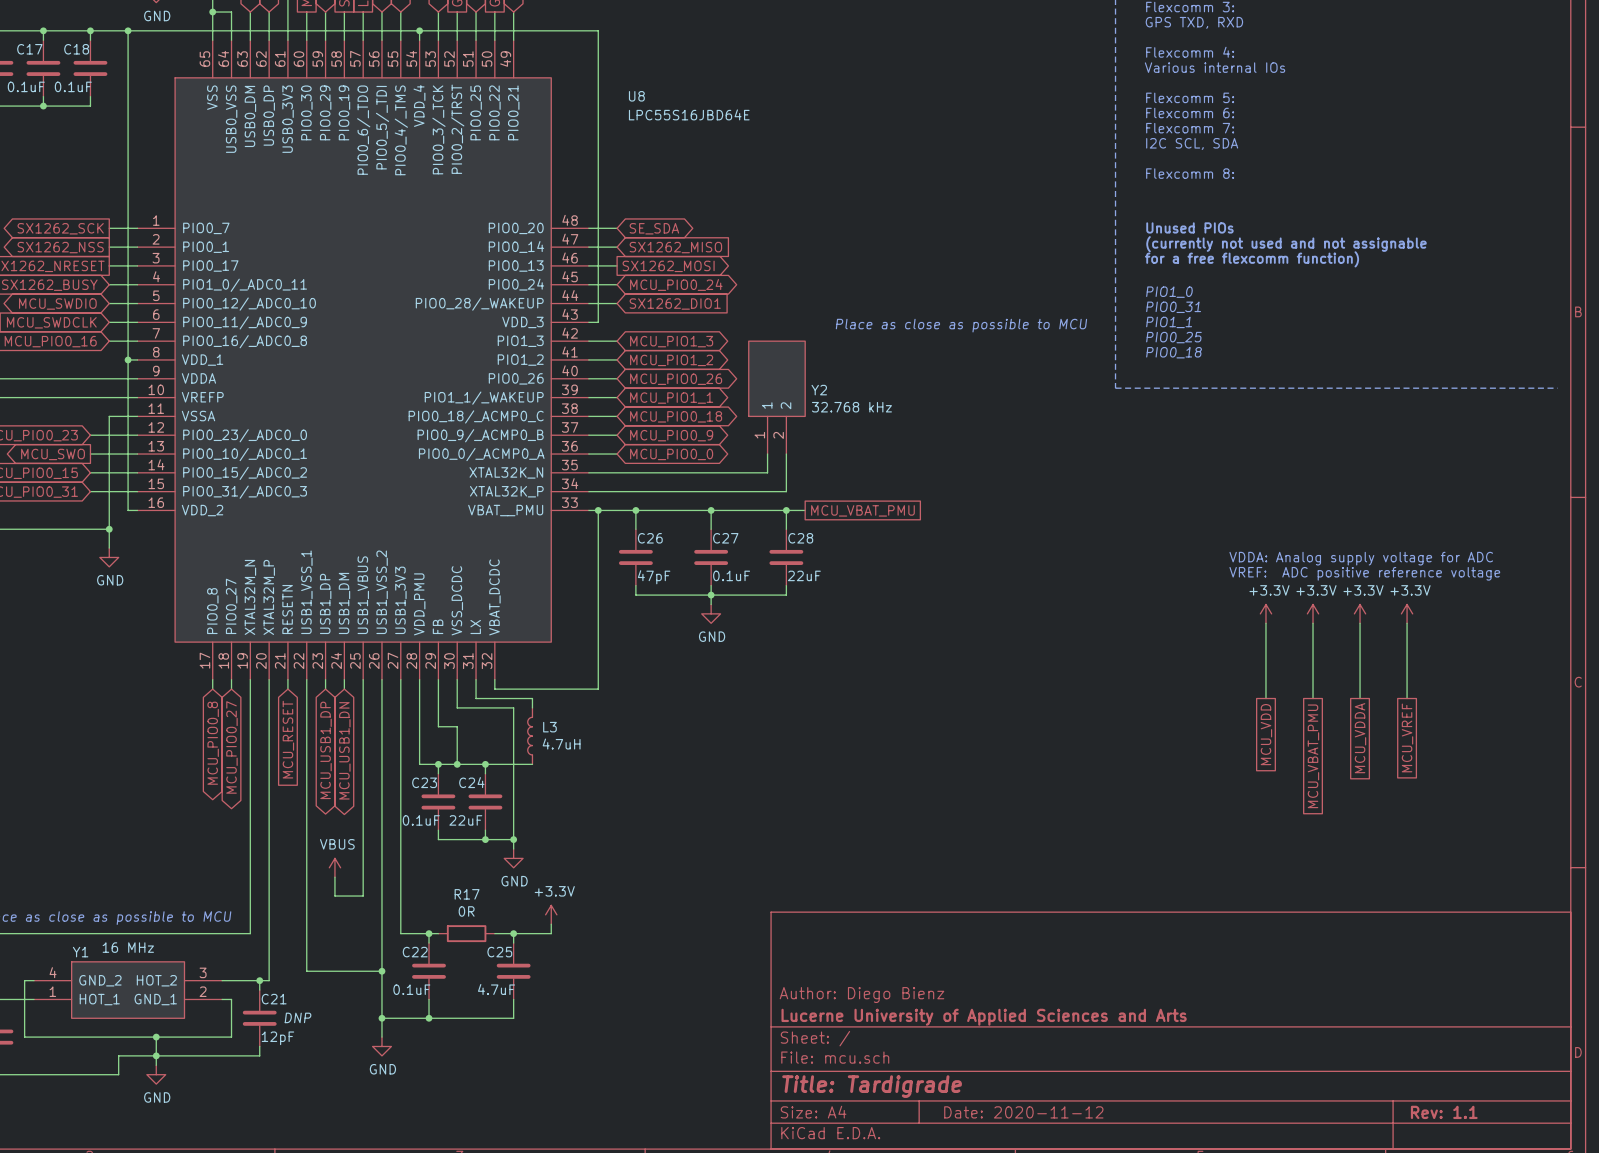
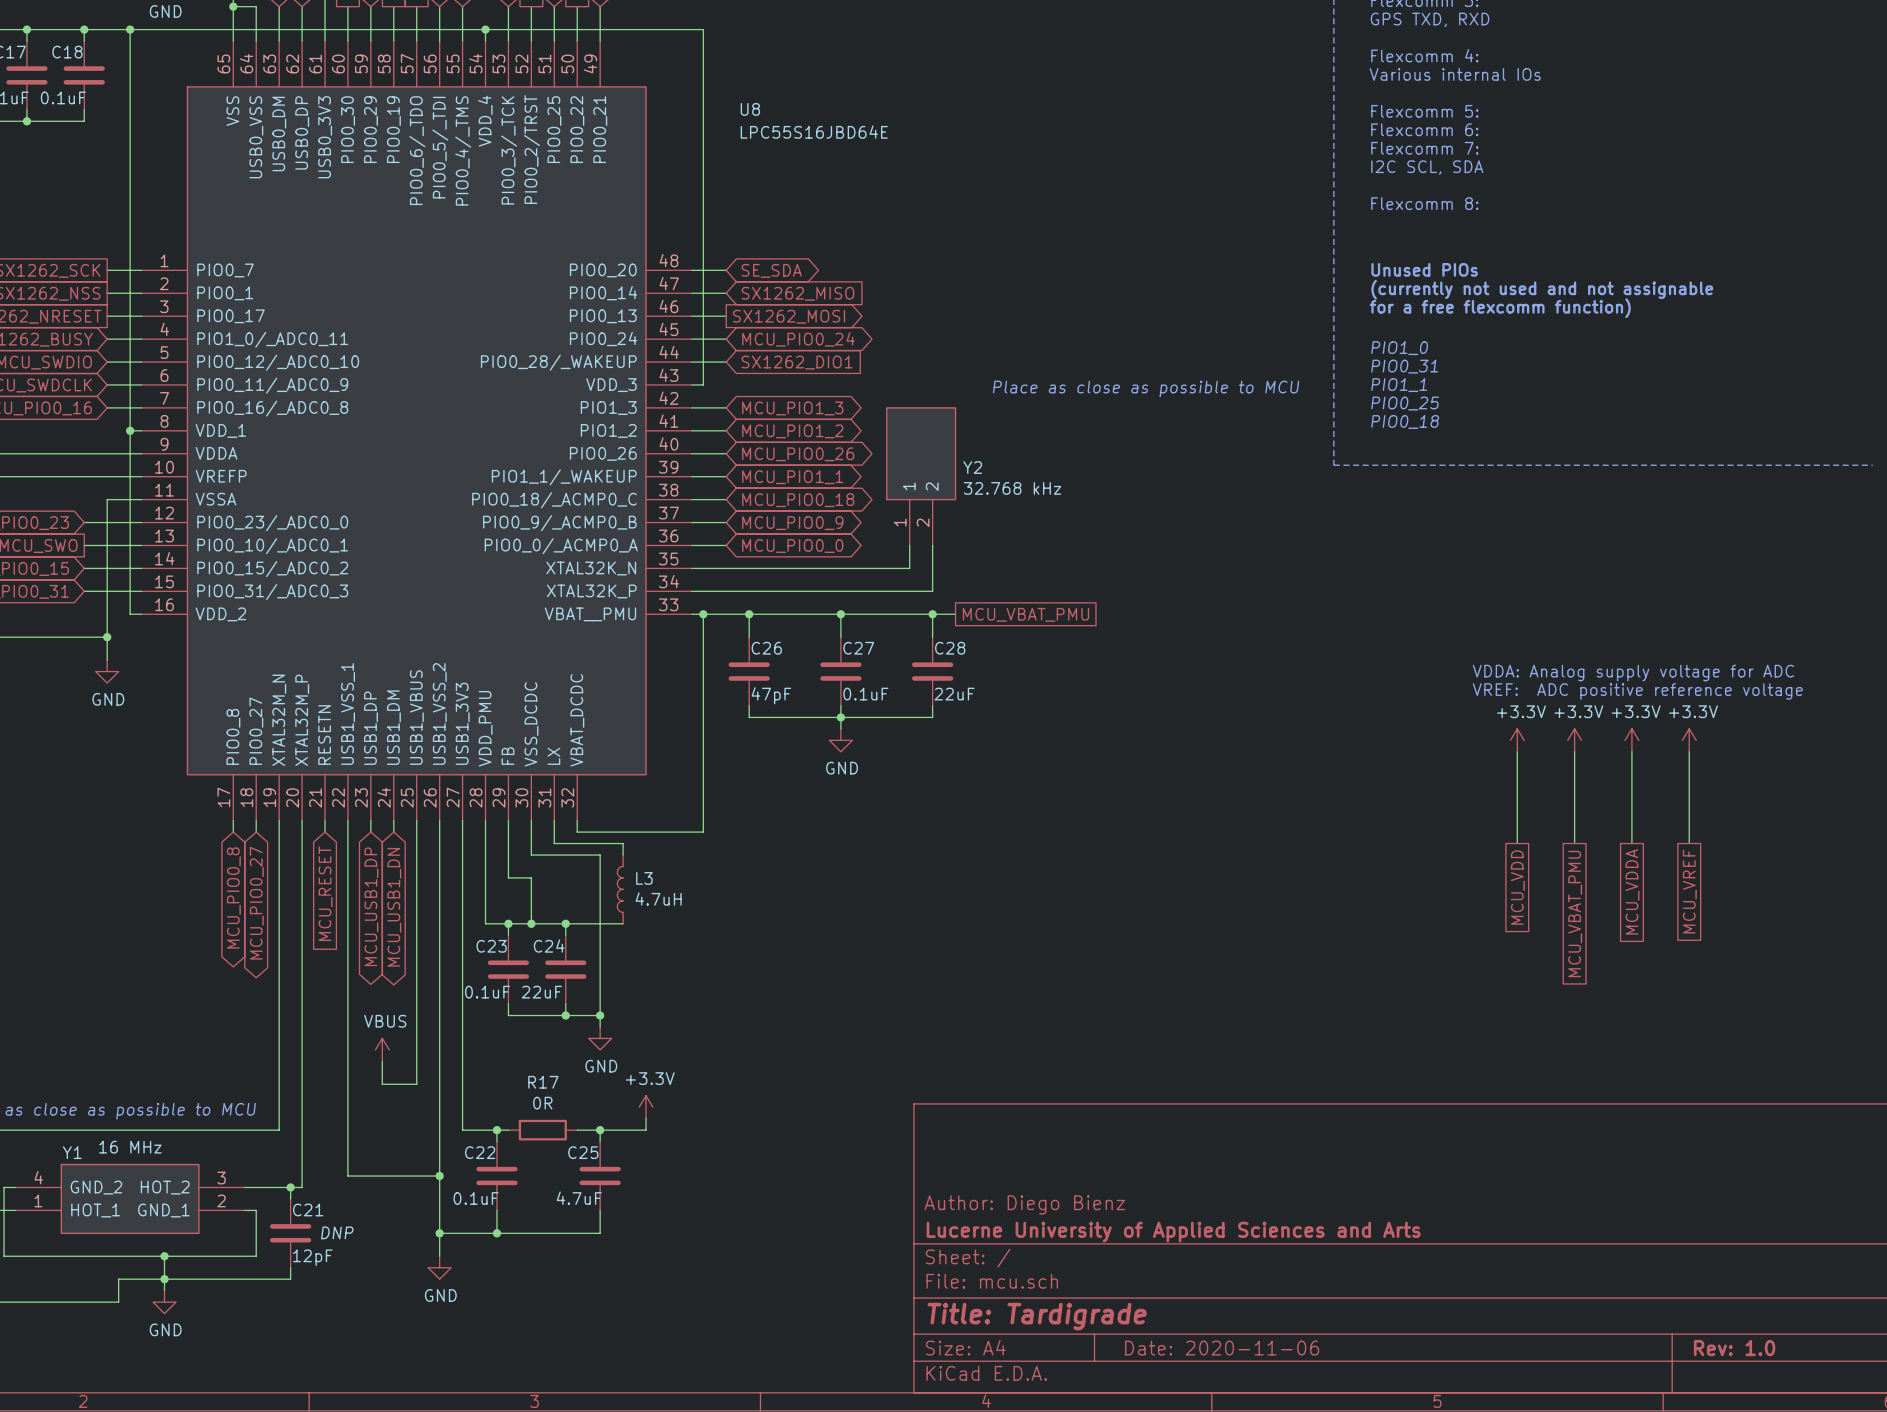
title block: Date: 2020-11-12 (1023, 1112) -> Date: 2020-11-06 (1222, 1348)
title block: Rev: 1.1 (1444, 1112) -> Rev: 1.0 (1734, 1348)

